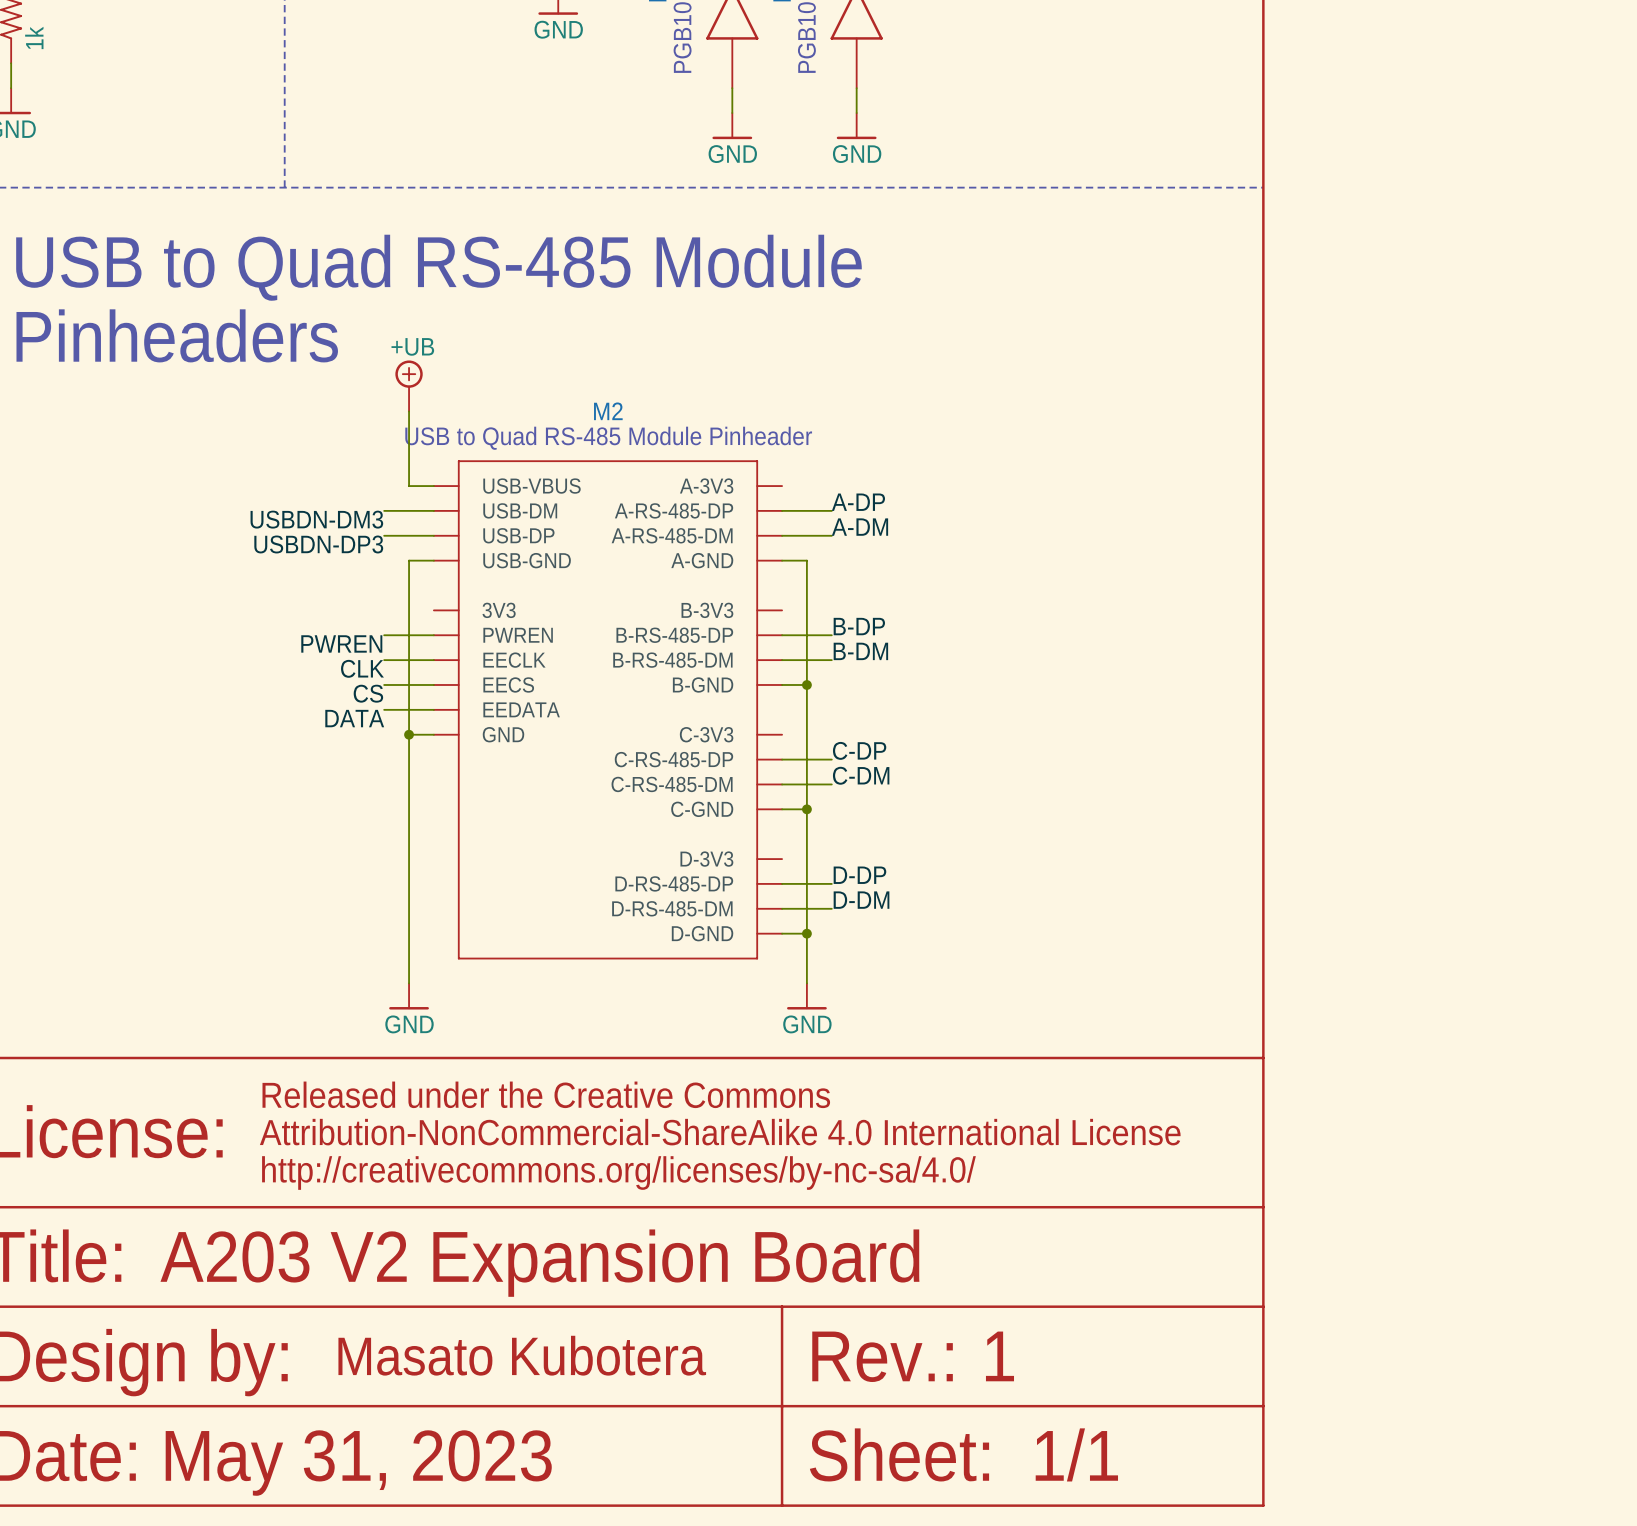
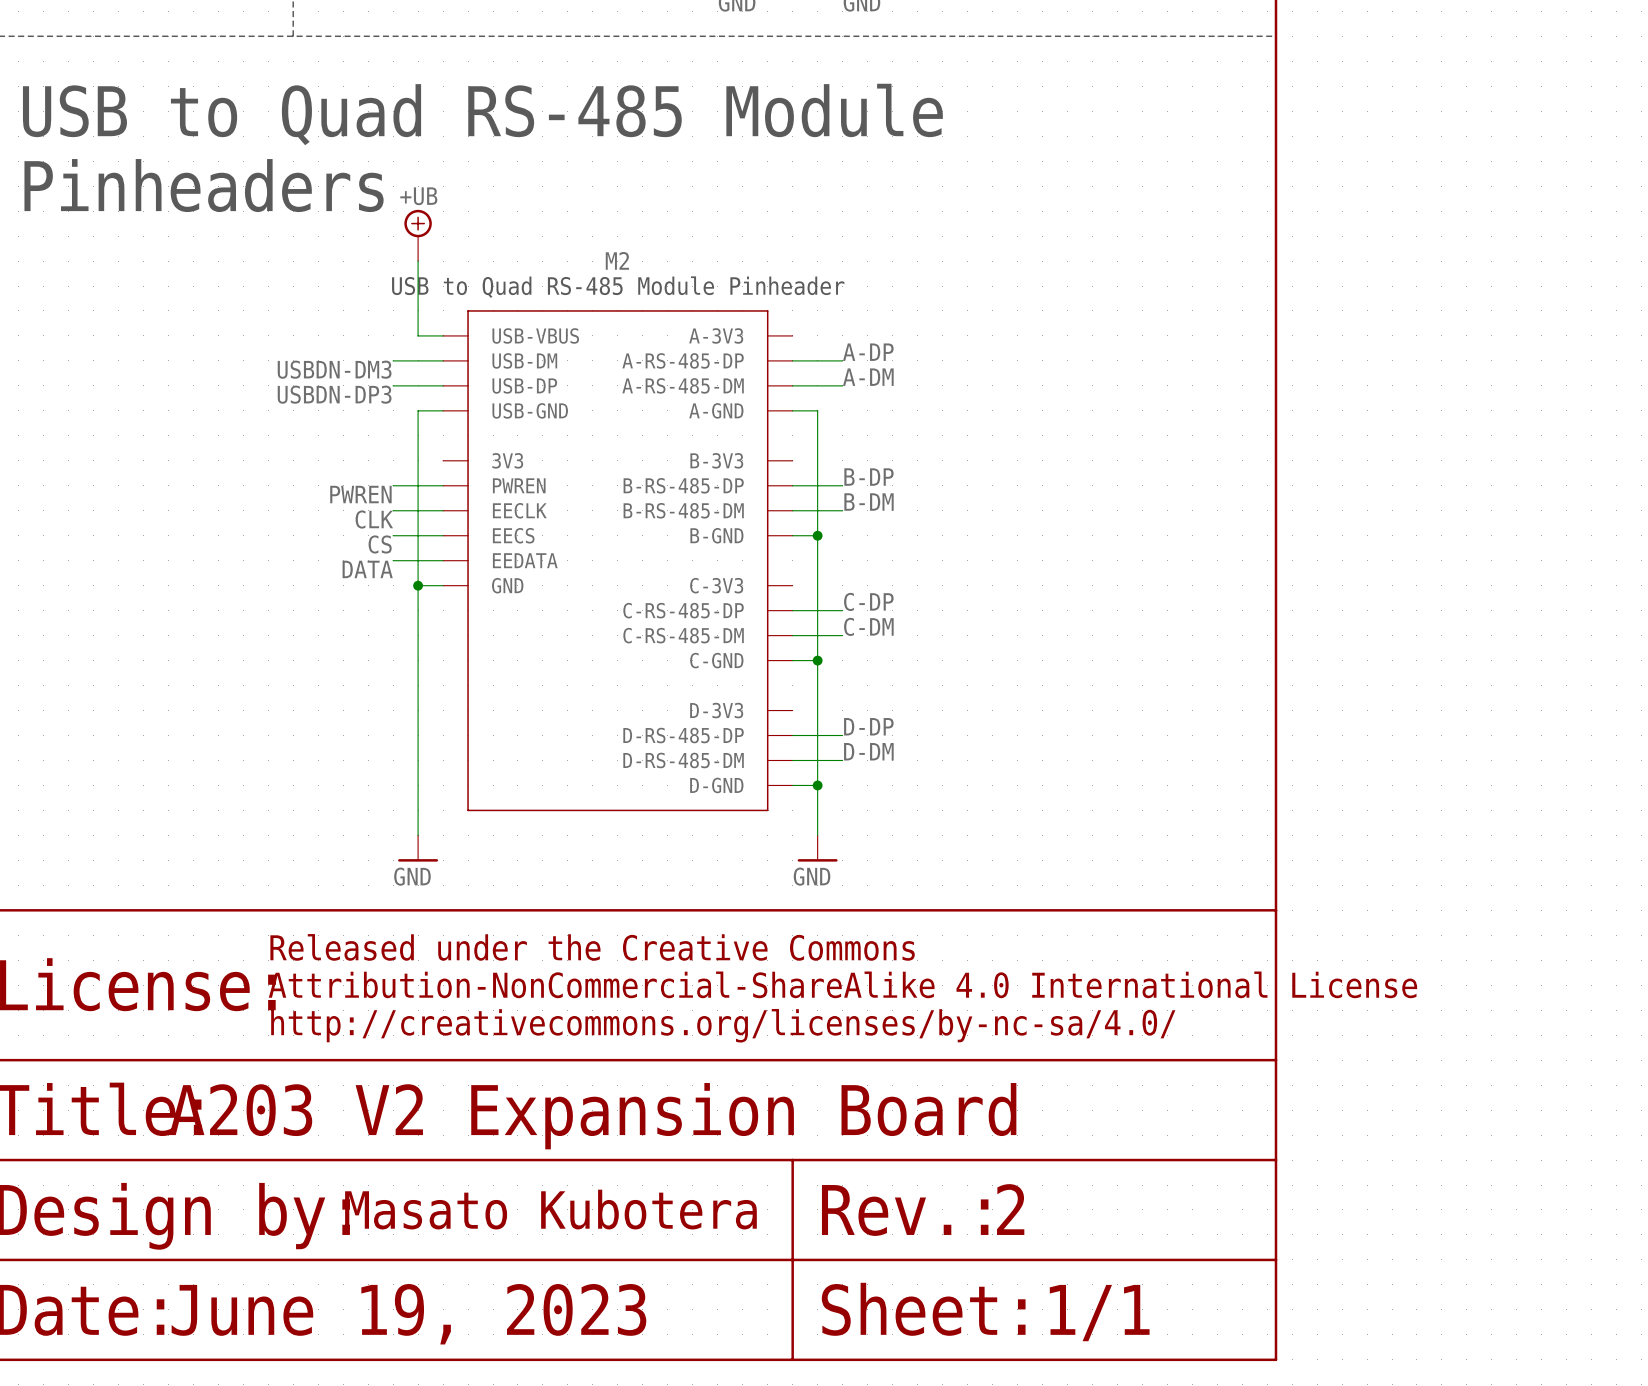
text: 1 (999, 1356) -> 2 (1010, 1209)
text: May 31, 2023 (358, 1463) -> June 19, 2023 (408, 1314)

